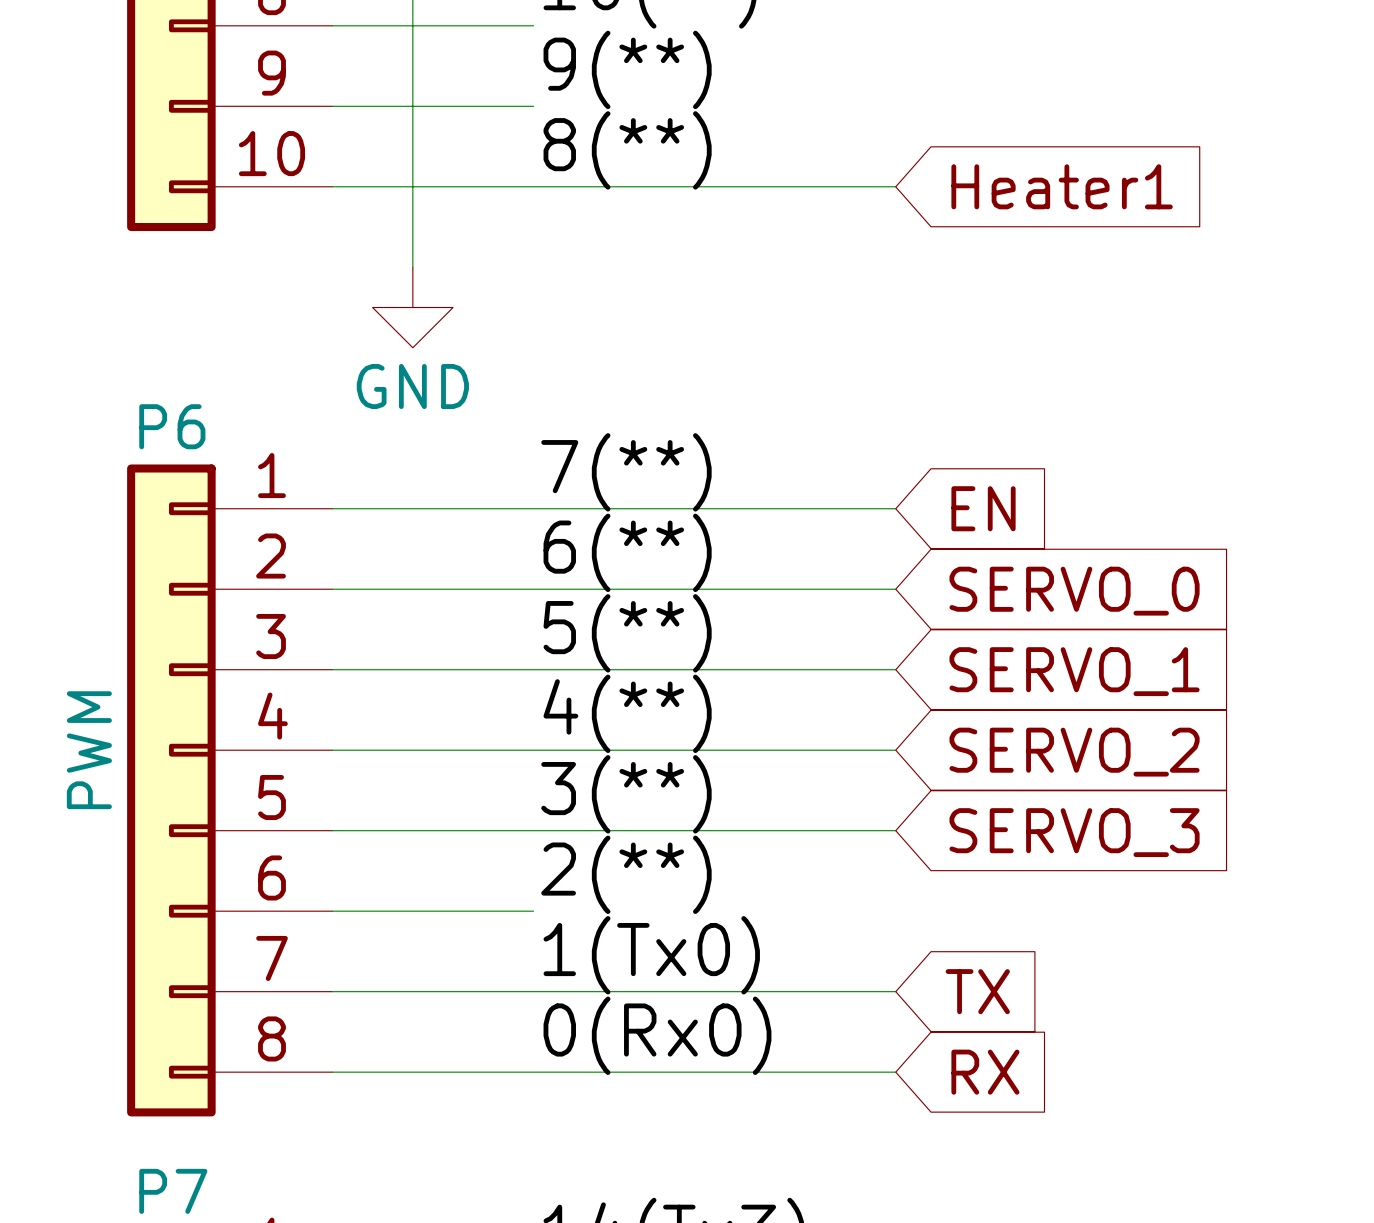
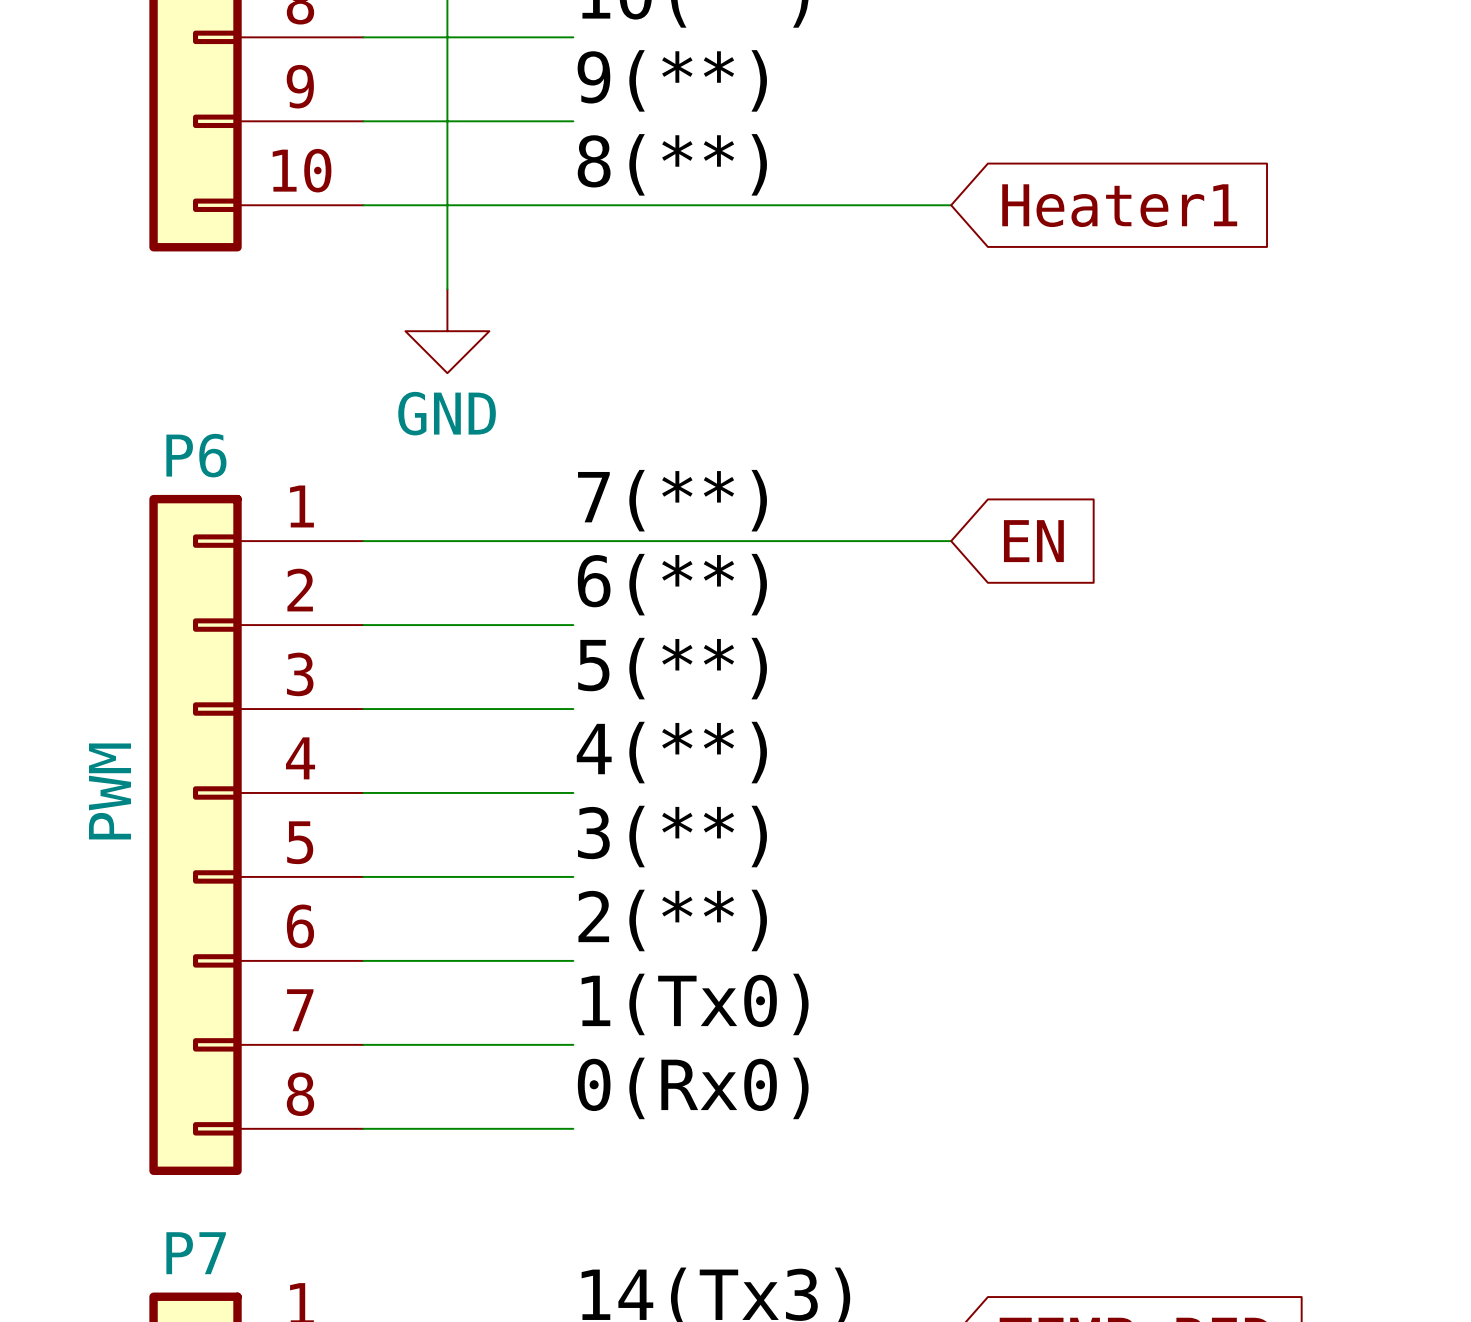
wire: (533, 589) (895, 589) -> none
global label: SERVO_0 (1074, 591) -> none
wire: (533, 669) (895, 669) -> none
global label: SERVO_1 (1074, 671) -> none
wire: (533, 750) (895, 750) -> none
global label: SERVO_2 (1074, 752) -> none
wire: (533, 830) (895, 830) -> none
global label: SERVO_3 (1074, 832) -> none
wire: (533, 991) (895, 991) -> none
global label: TX (977, 991) -> none
wire: (533, 1072) (895, 1072) -> none
global label: RX (985, 1072) -> none

